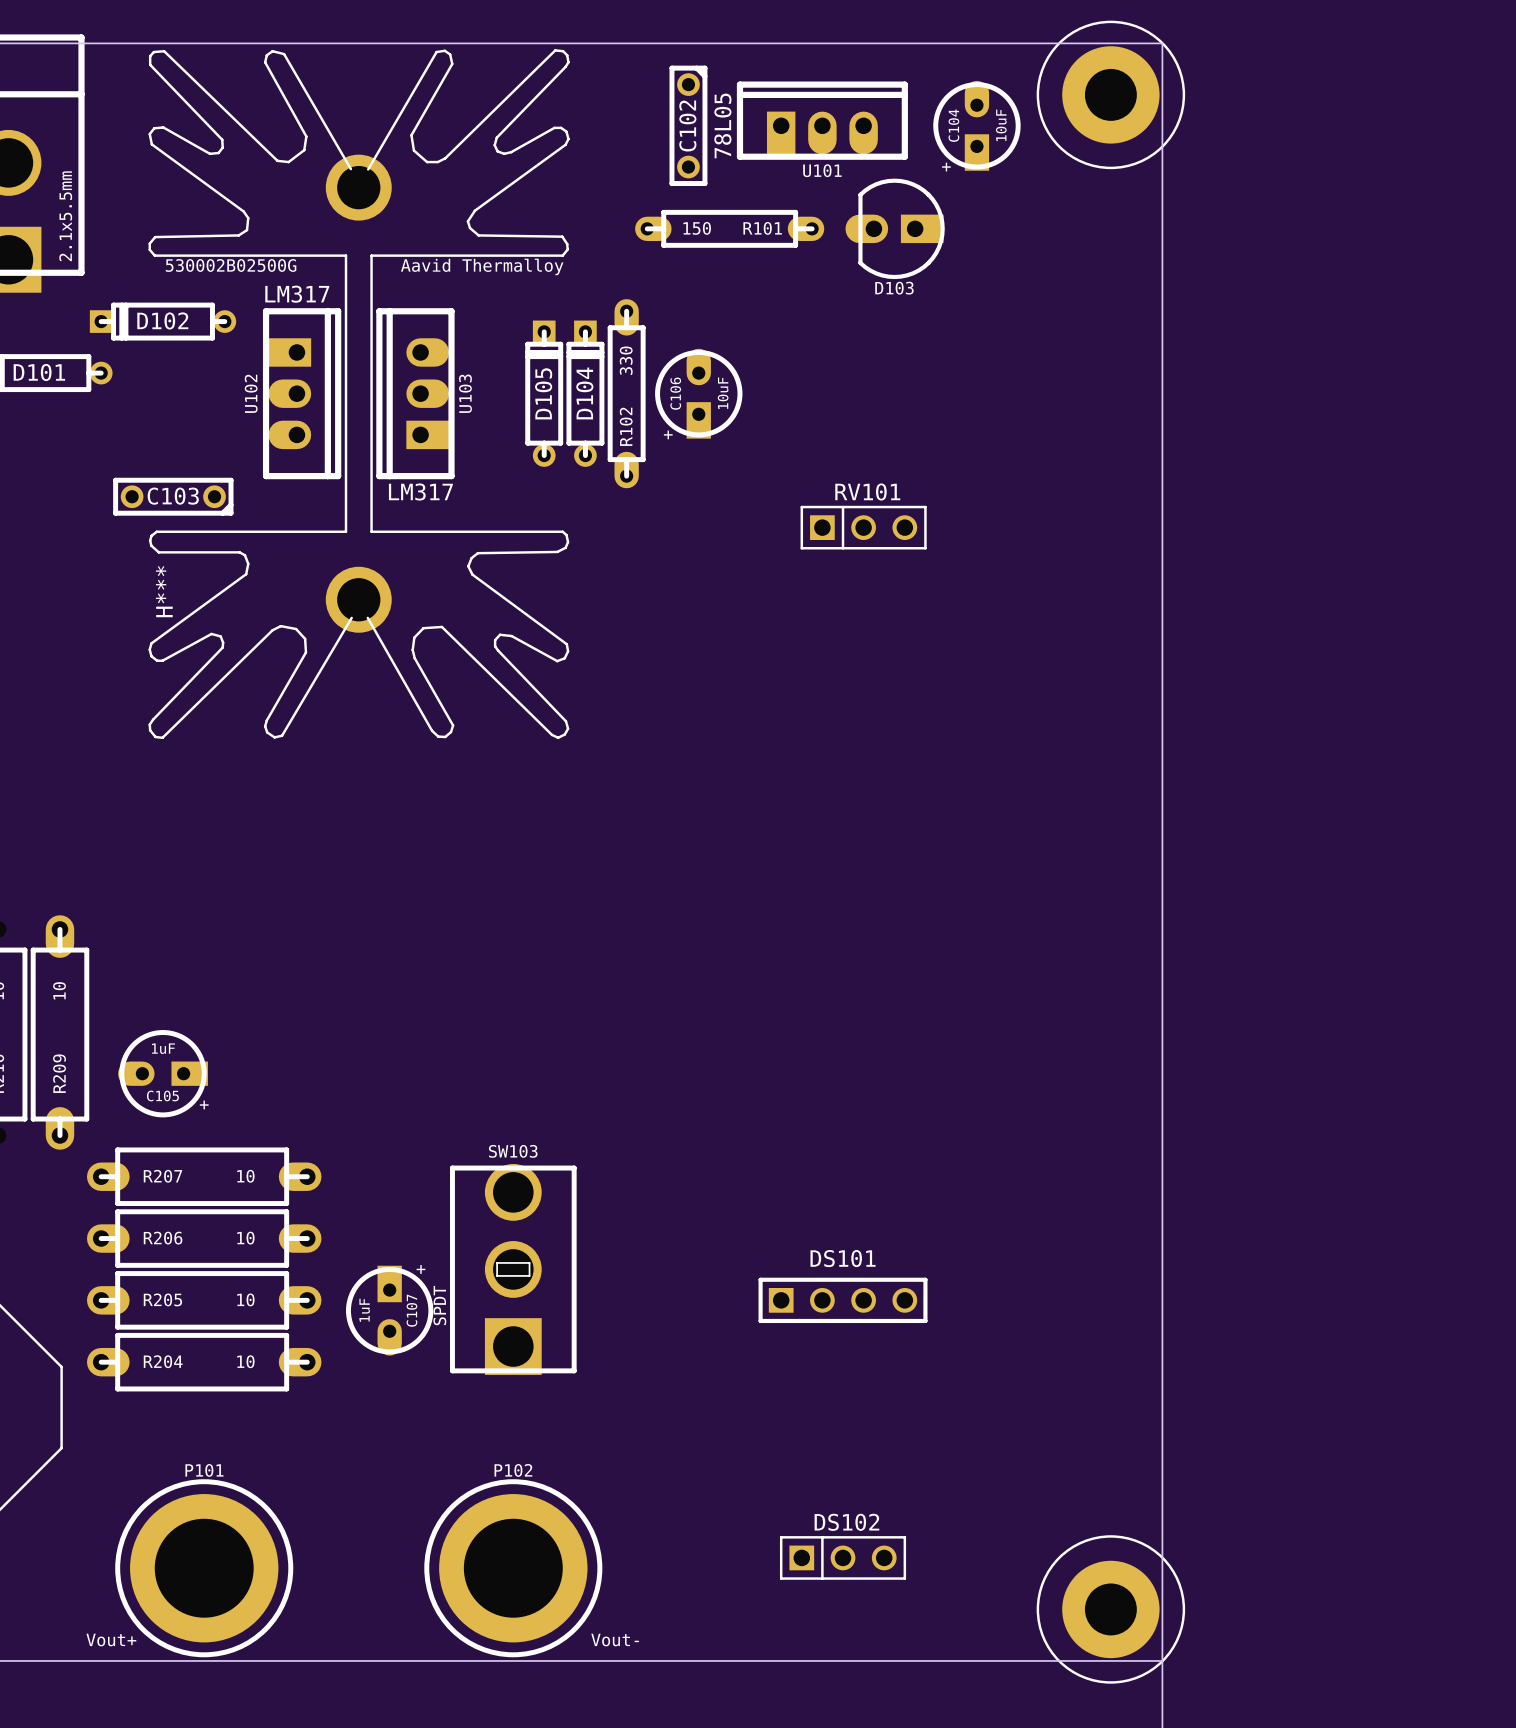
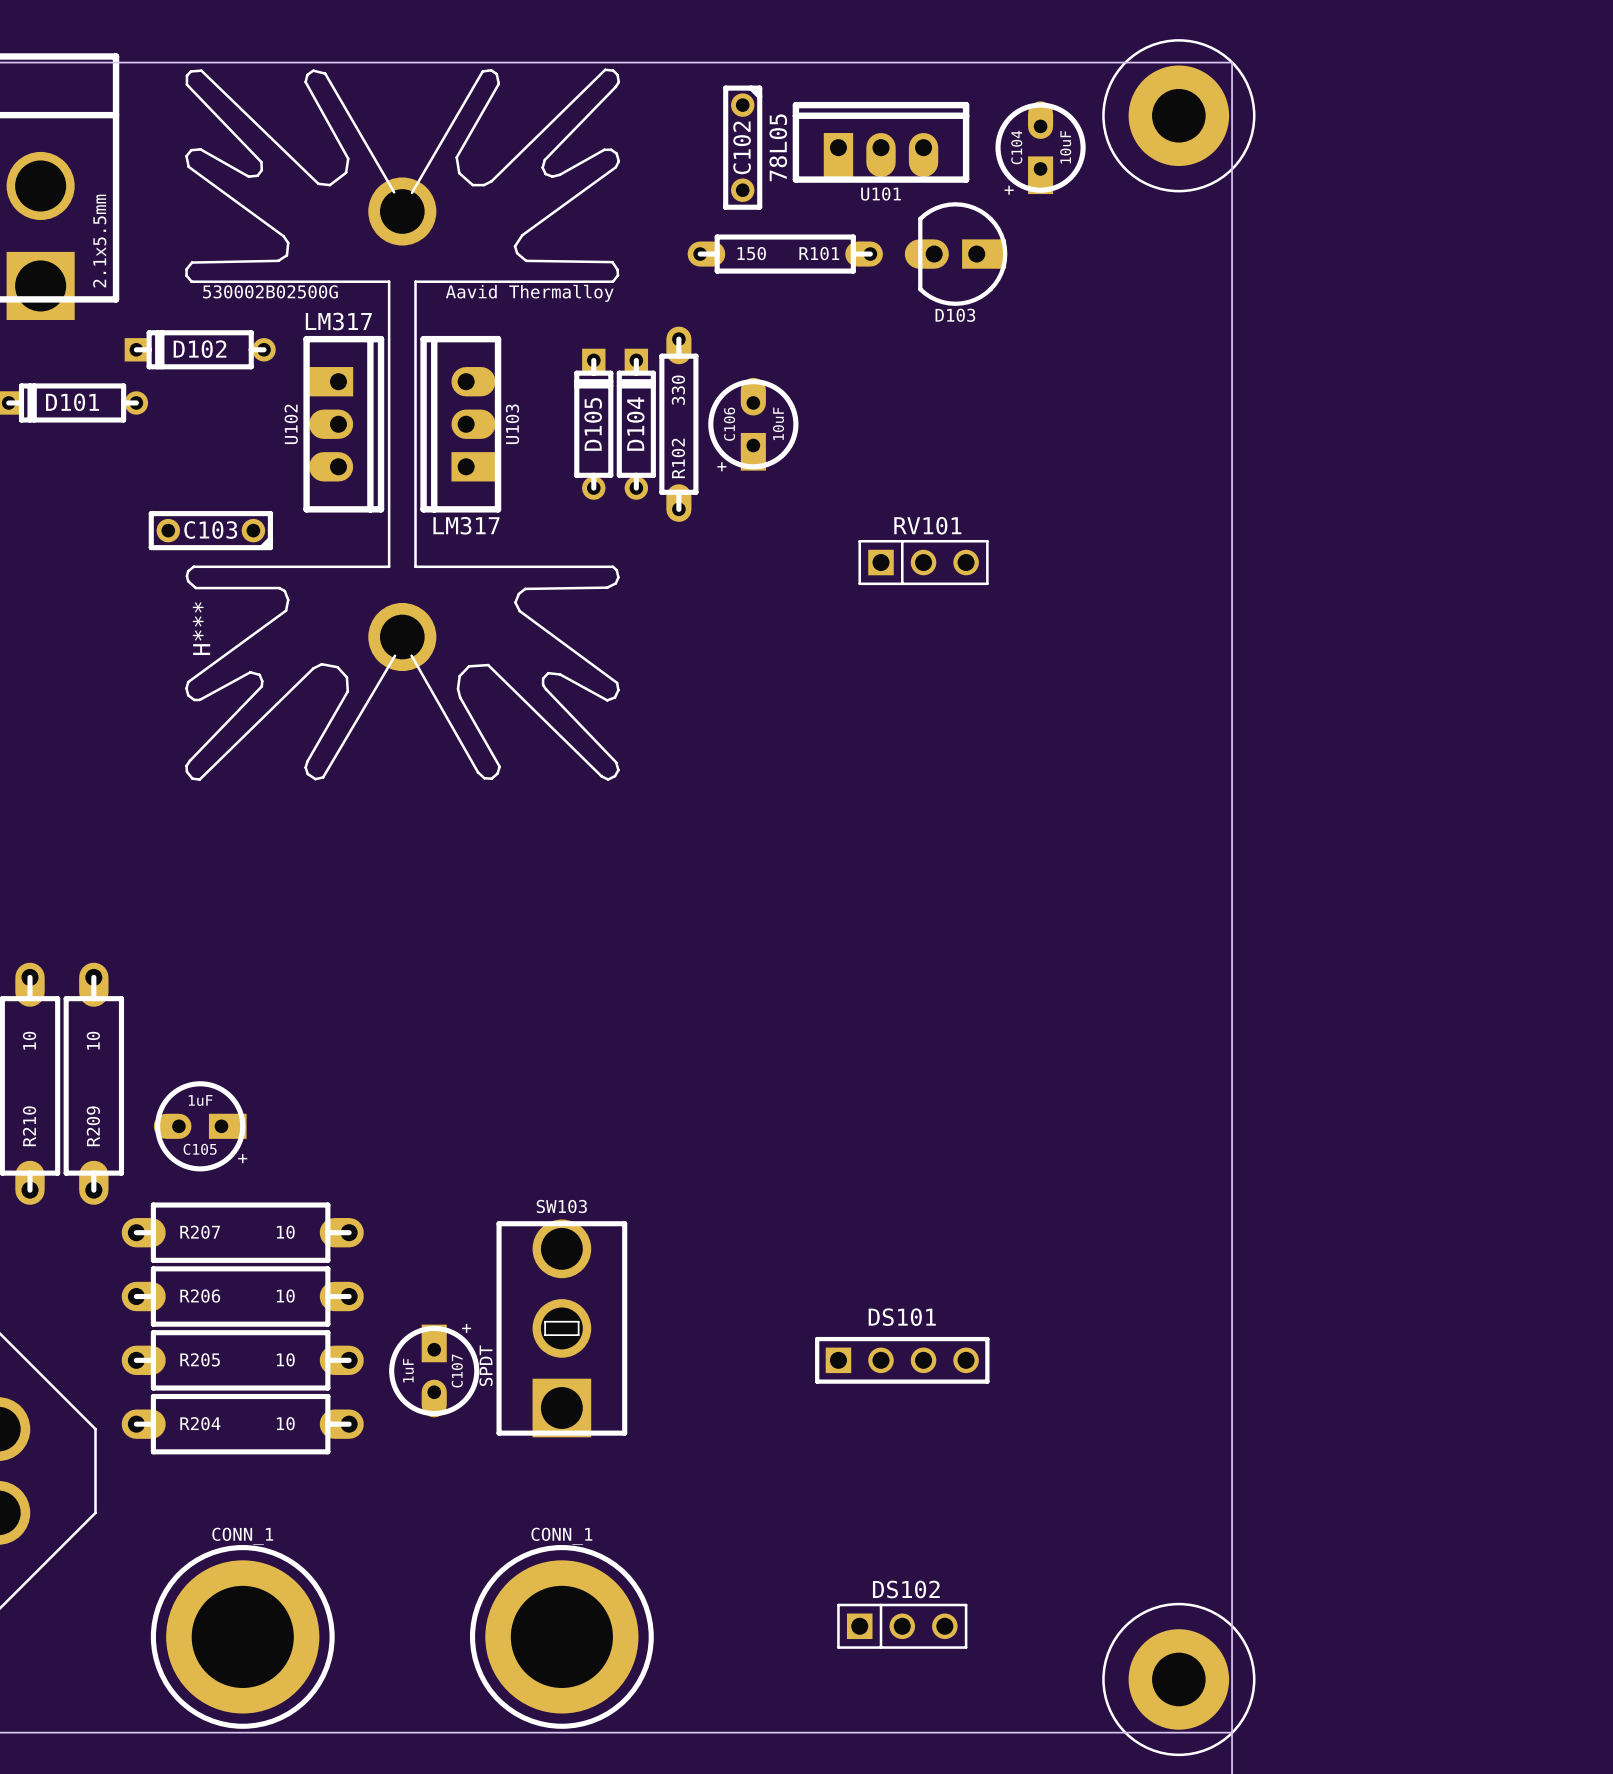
P101 name: P101 (204, 1470) -> none
P102 name: P102 (513, 1470) -> none
P101 value: Vout+ (111, 1640) -> CONN_1 (242, 1536)
P102 value: Vout- (615, 1640) -> CONN_1 (561, 1536)

